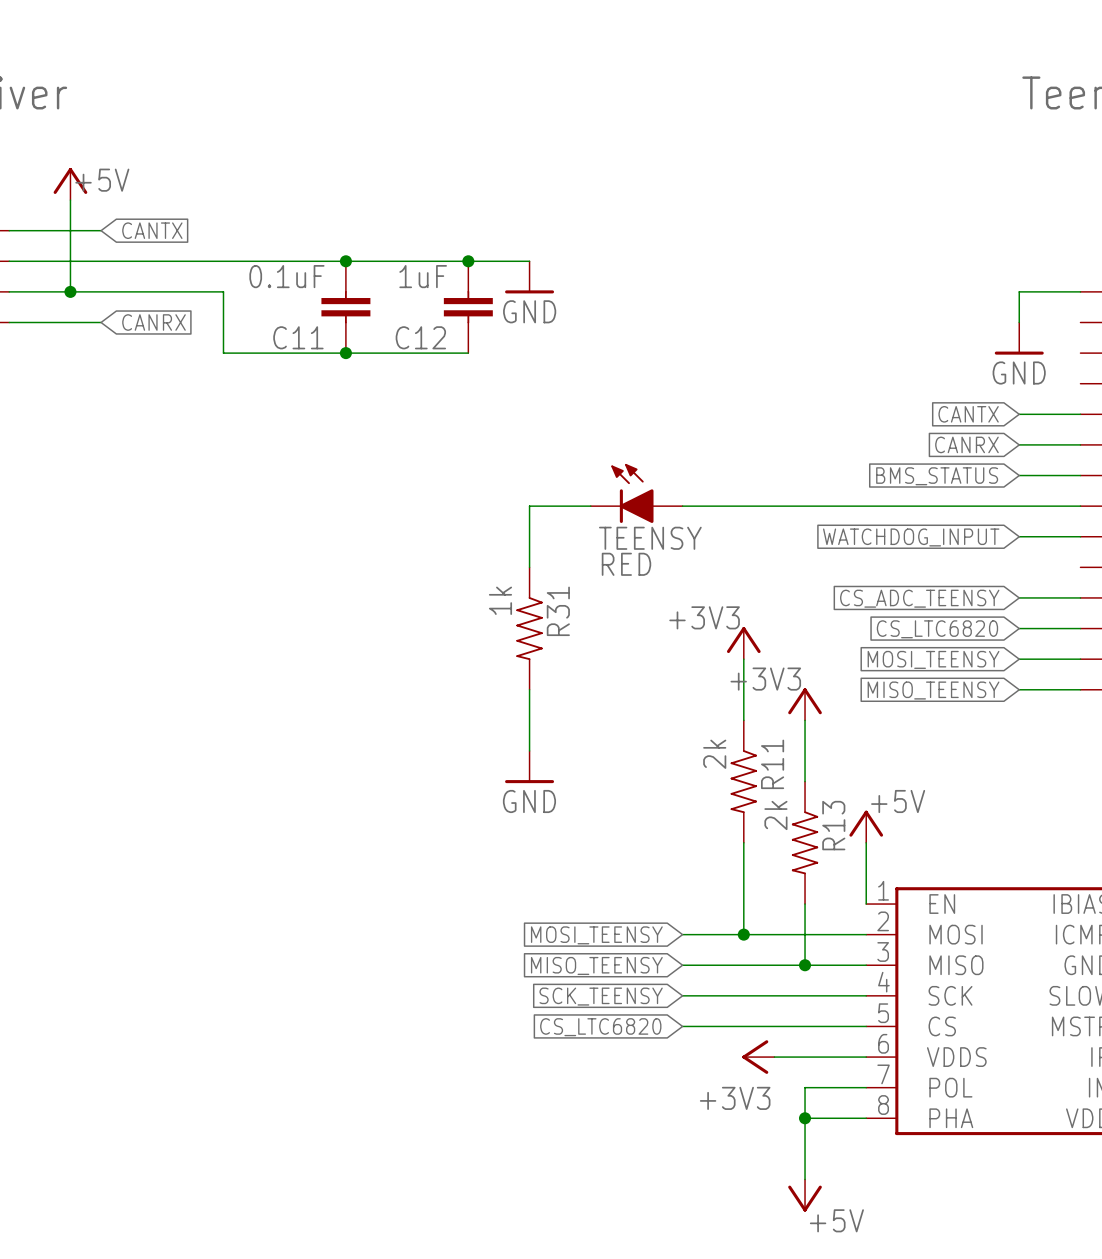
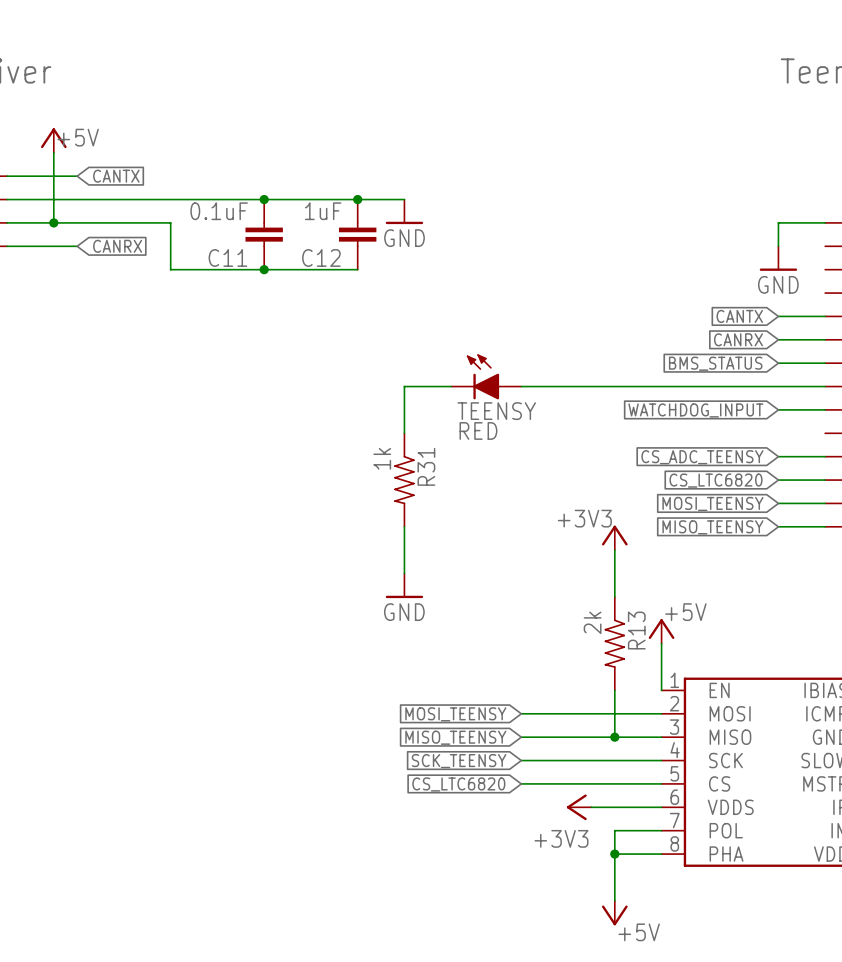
power symbol: +3V3 (743, 643) -> none
wire: (743, 659) (743, 720) -> none
R11: 2k (743, 781) -> none
wire: (743, 842) (743, 934) -> none
junction: (743, 934) -> none

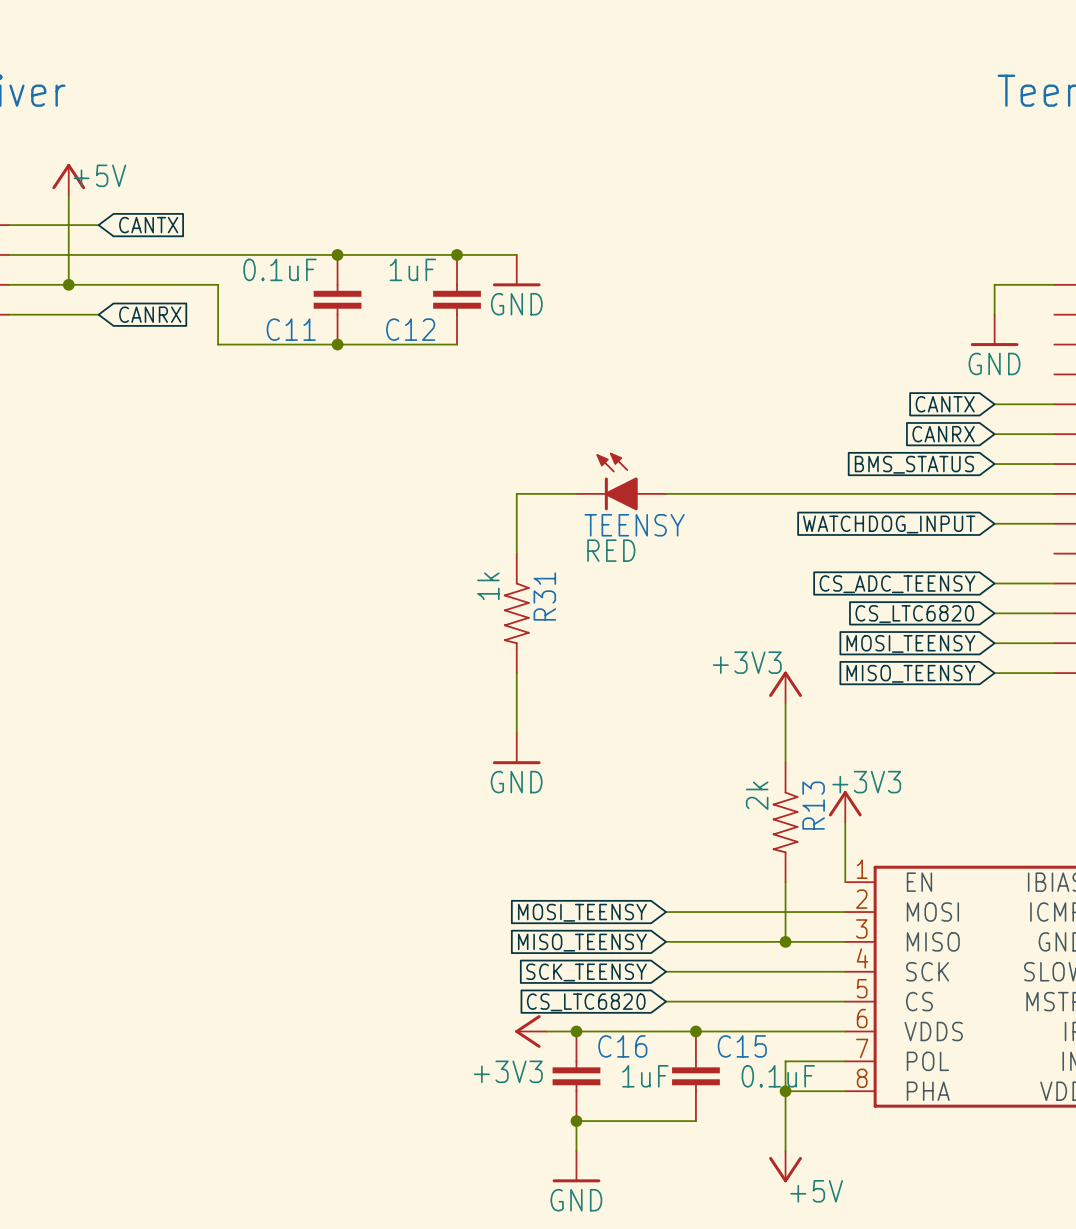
power symbol: +5V (661, 631) -> +3V3 (845, 806)
wire: none -> (546, 1031) (755, 1031)
junction: none -> (576, 1031)
junction: none -> (695, 1031)
power symbol position: +3V3 (579, 807) -> +3V3 (530, 1031)
C16: none -> 1uF (576, 1076)
C15: none -> 0.1uF (695, 1076)
junction: none -> (576, 1121)
wire: none -> (695, 1121) (576, 1121) (576, 1150)
power symbol: none -> GND (576, 1166)

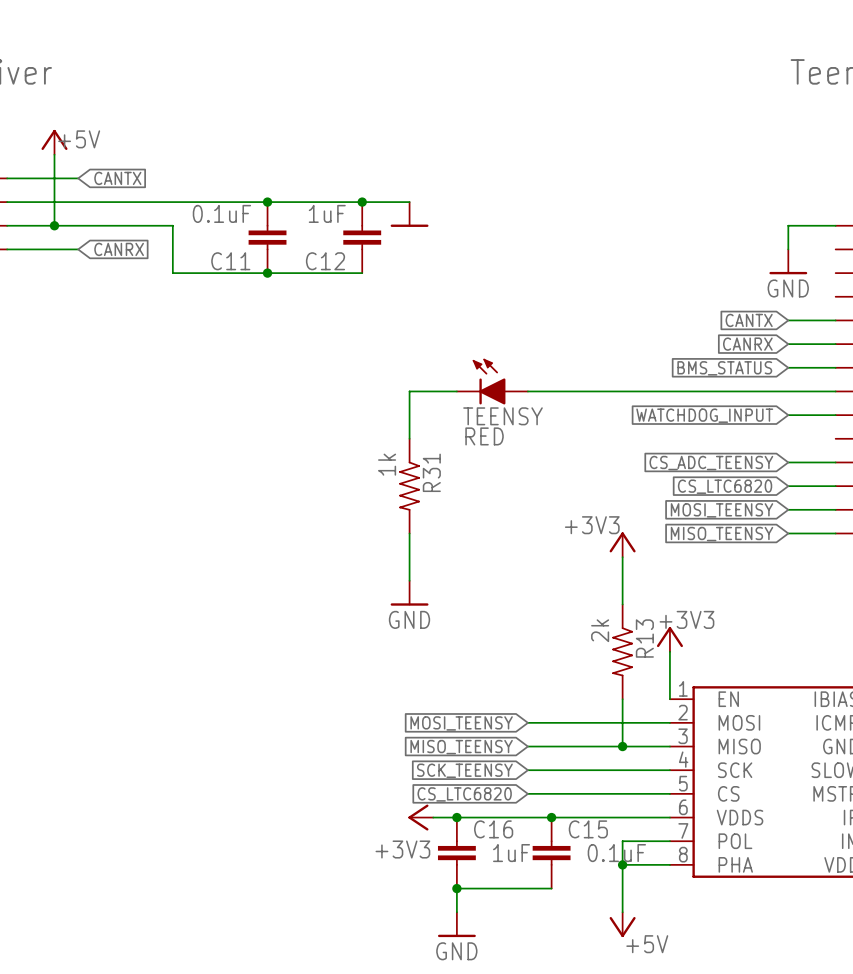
power symbol text: GND (516, 304) -> none

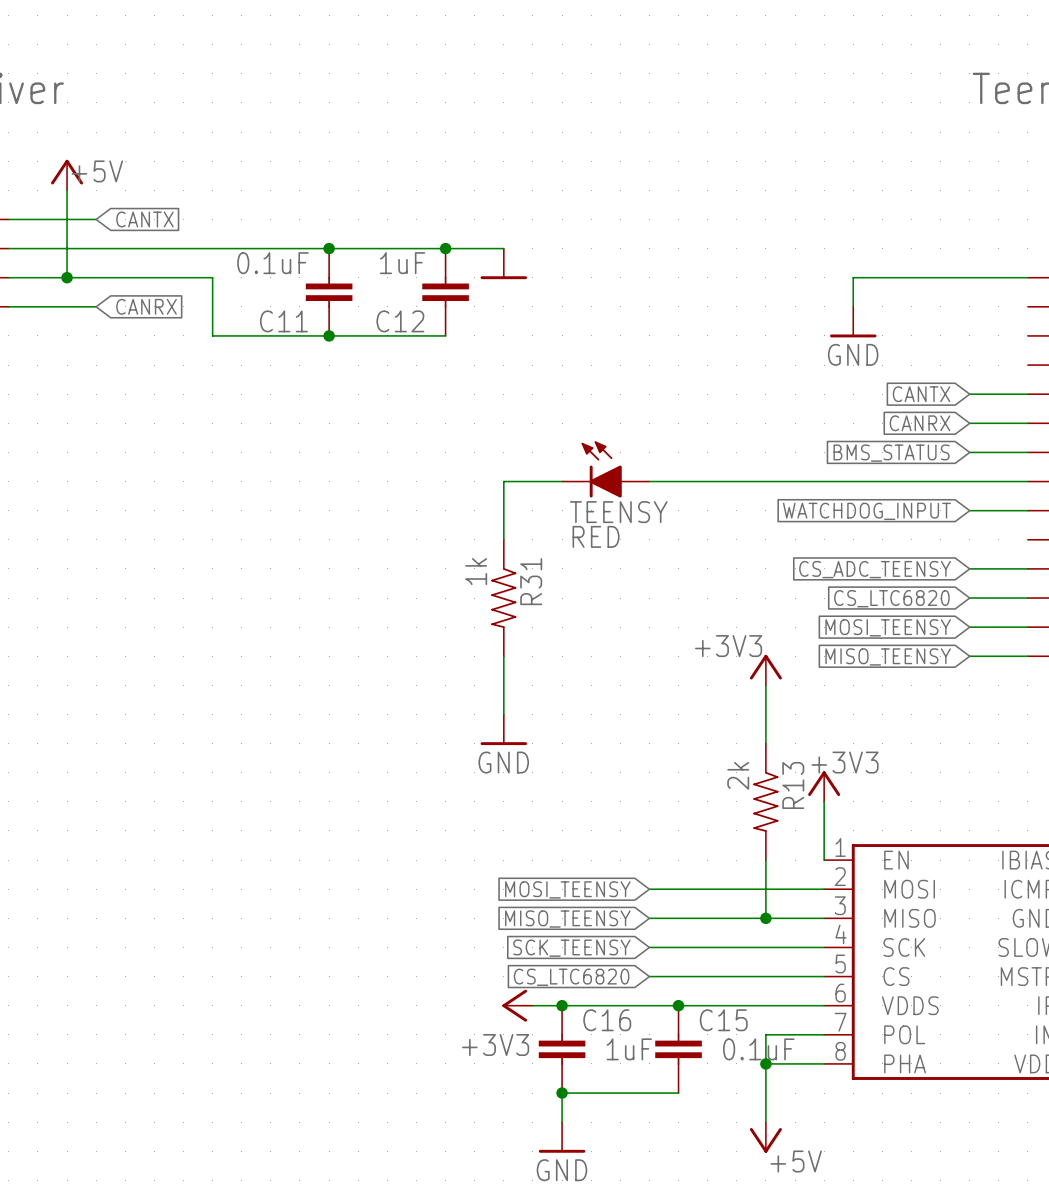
wire: (788, 225) (788, 249) -> (969, 277) (853, 277) (853, 306)
power symbol position: GND (788, 261) -> GND (853, 322)

